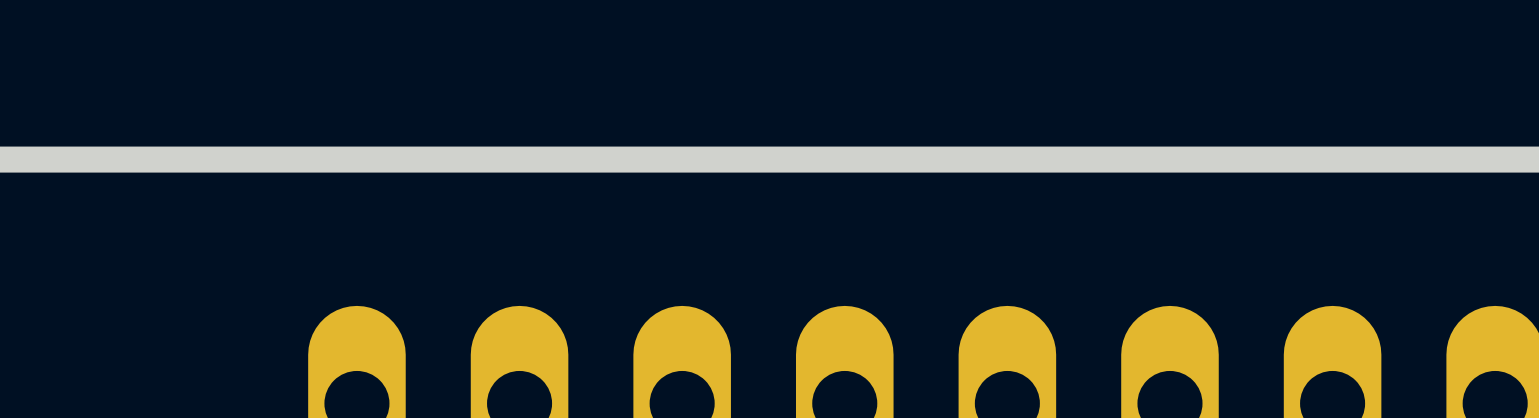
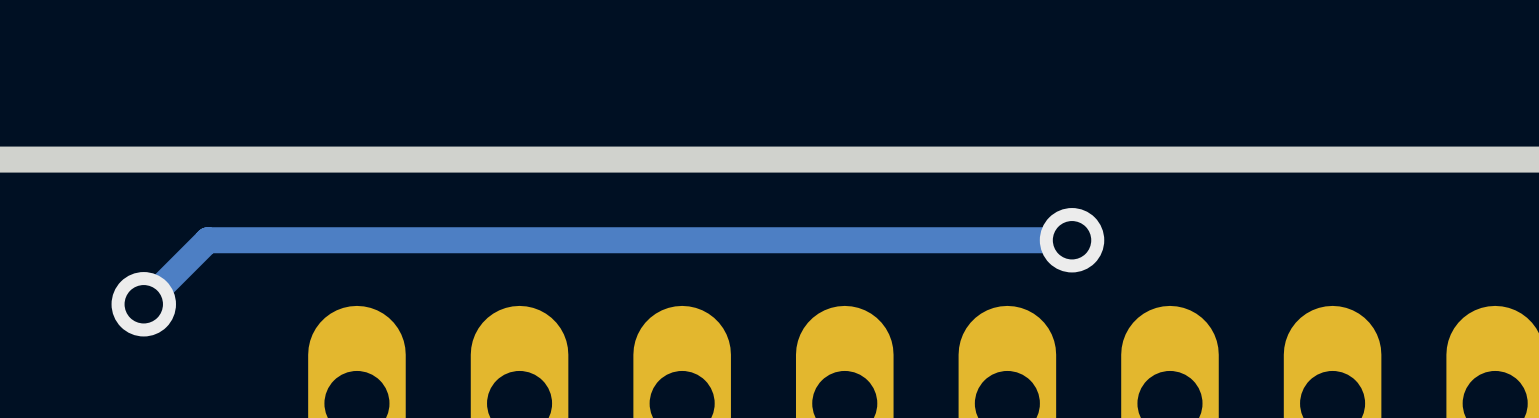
track: none -> (1072, 240) (207, 240) (143, 304)
via: none -> (1072, 240)
via: none -> (143, 304)

